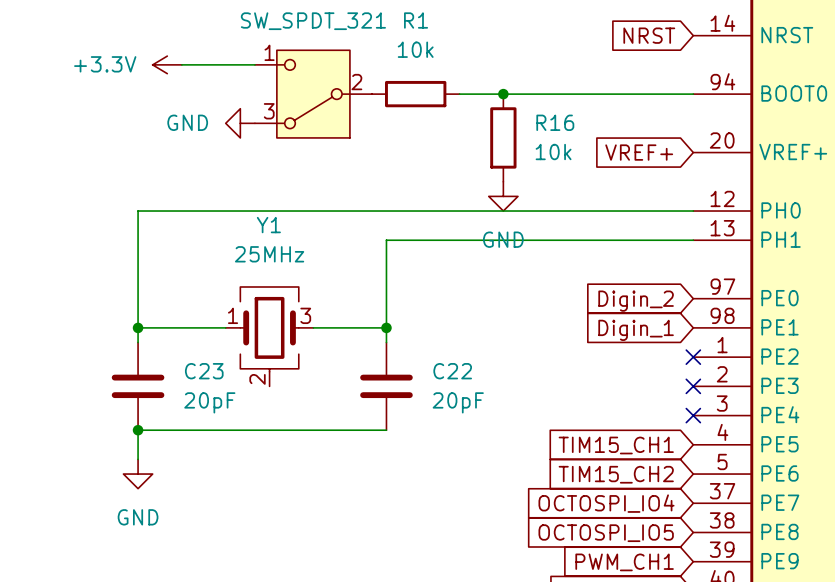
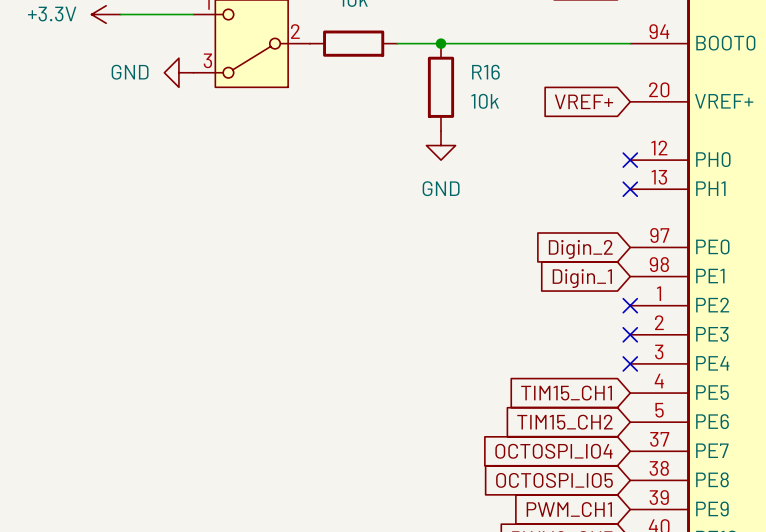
wire: (693, 211) (138, 211) (138, 342) -> none
no-connect mark: none -> (630, 160)
wire: (693, 240) (386, 240) (386, 342) -> none
no-connect mark: none -> (630, 189)
wire: (138, 327) (225, 327) -> none
junction: (138, 327) -> none
wire: (313, 327) (386, 327) -> none
junction: (386, 327) -> none
Y1: 25MHz (269, 336) -> none
C23: 20pF (138, 386) -> none
C22: 20pF (386, 386) -> none
junction: (138, 430) -> none
wire: (386, 430) (138, 430) (138, 459) -> none
power symbol: GND (138, 474) -> none

